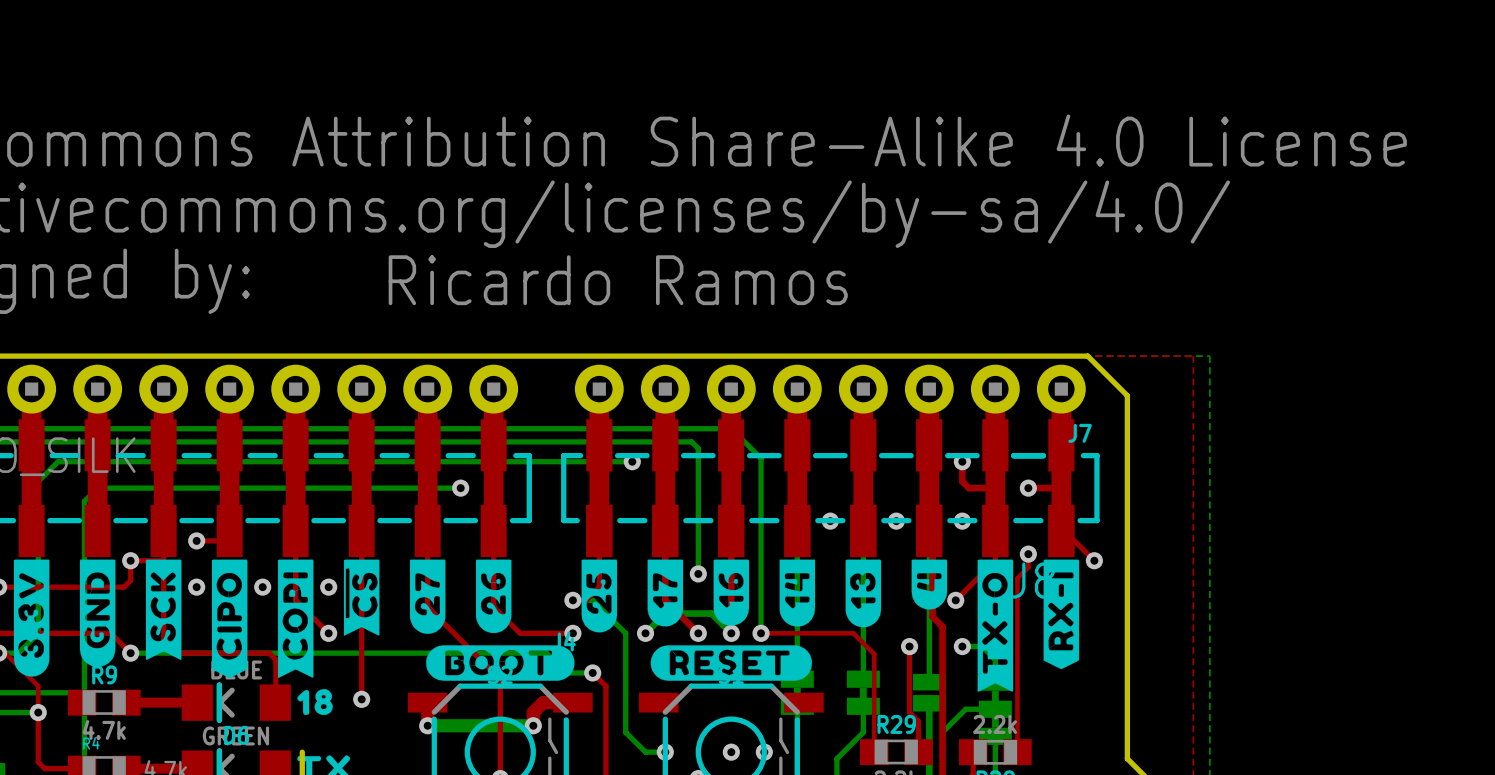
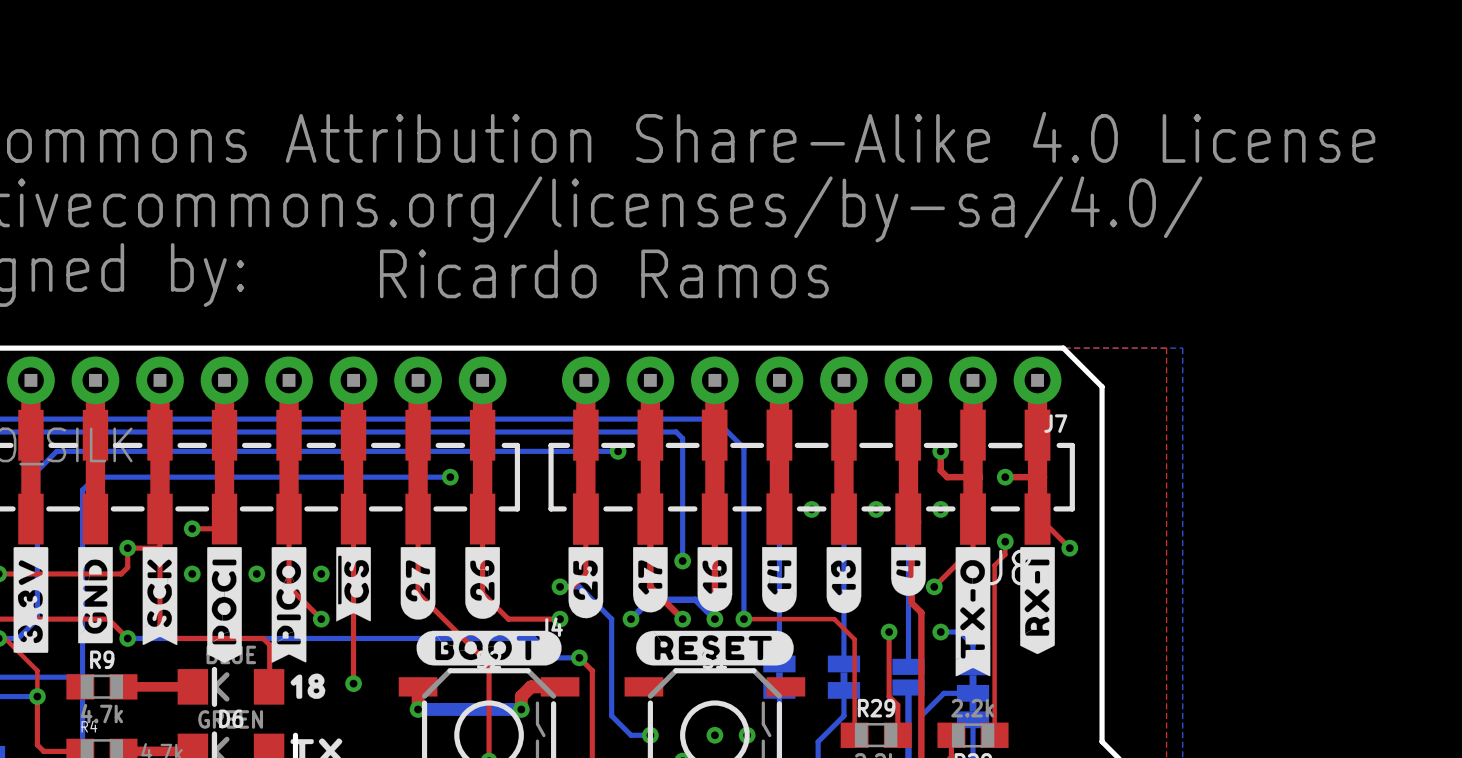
drawing shape: [13, 559, 50, 677] -> [13, 547, 49, 653]
drawing shape: [79, 559, 116, 667] -> [78, 547, 113, 644]
drawing shape: [211, 559, 248, 678] -> [207, 547, 242, 663]
drawing shape: [277, 559, 314, 678] -> [271, 547, 307, 663]

